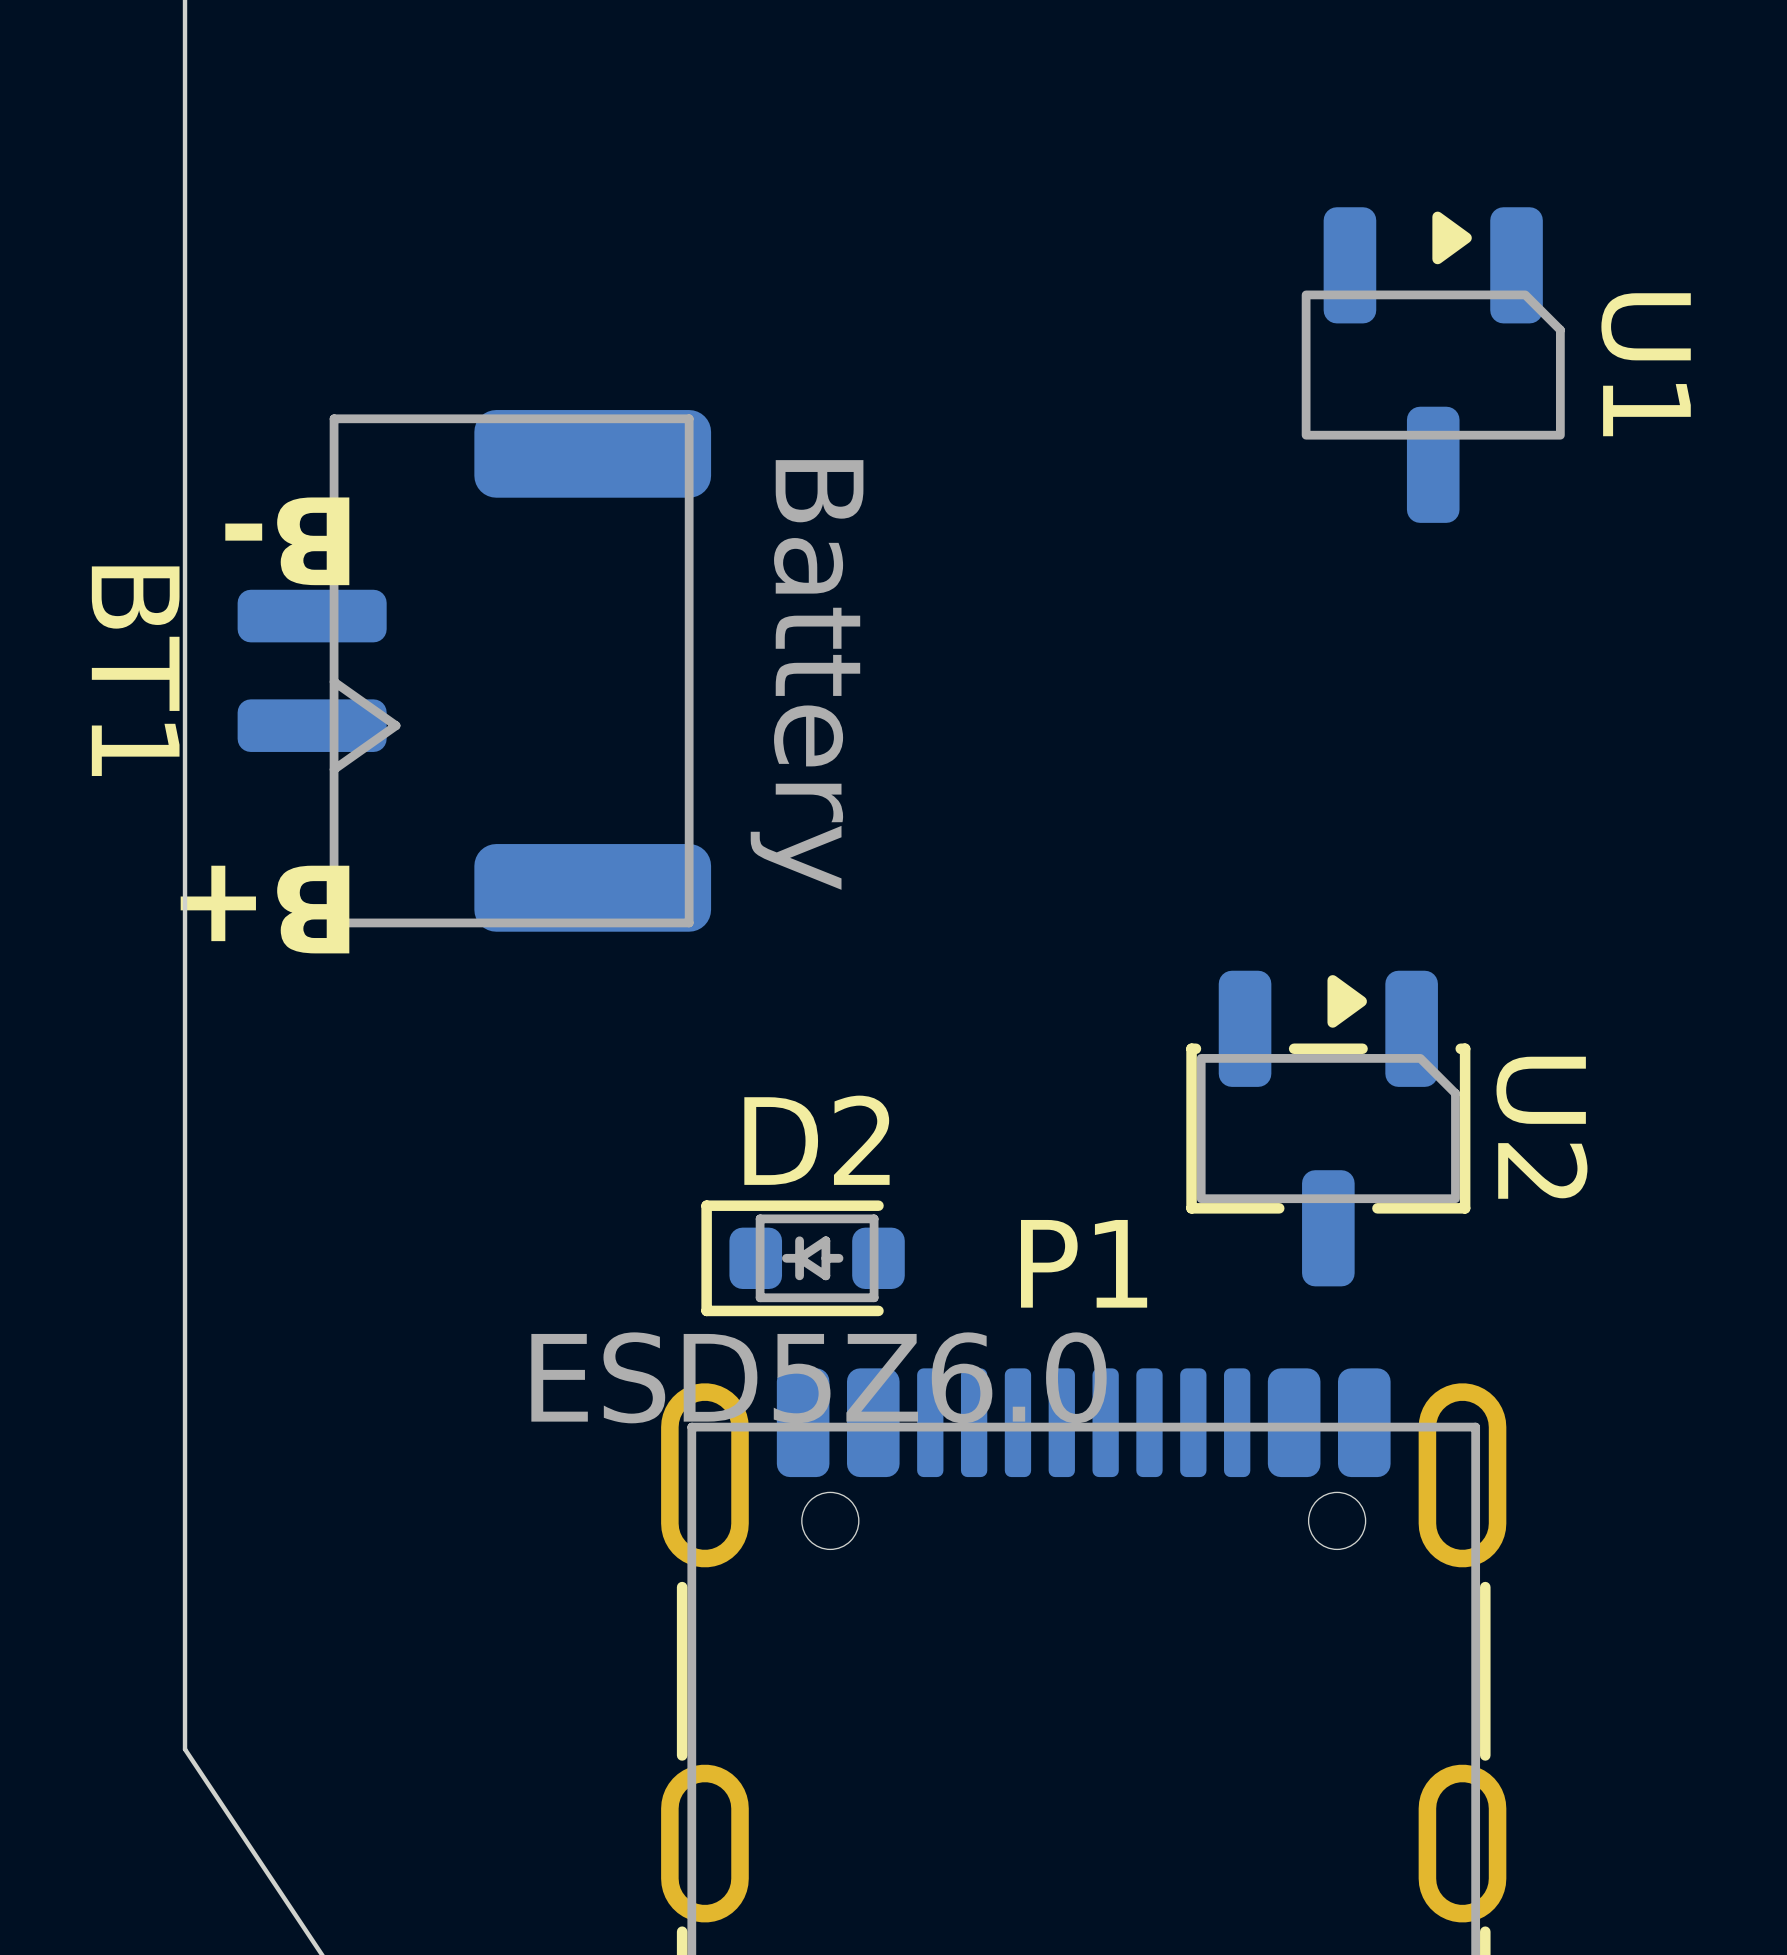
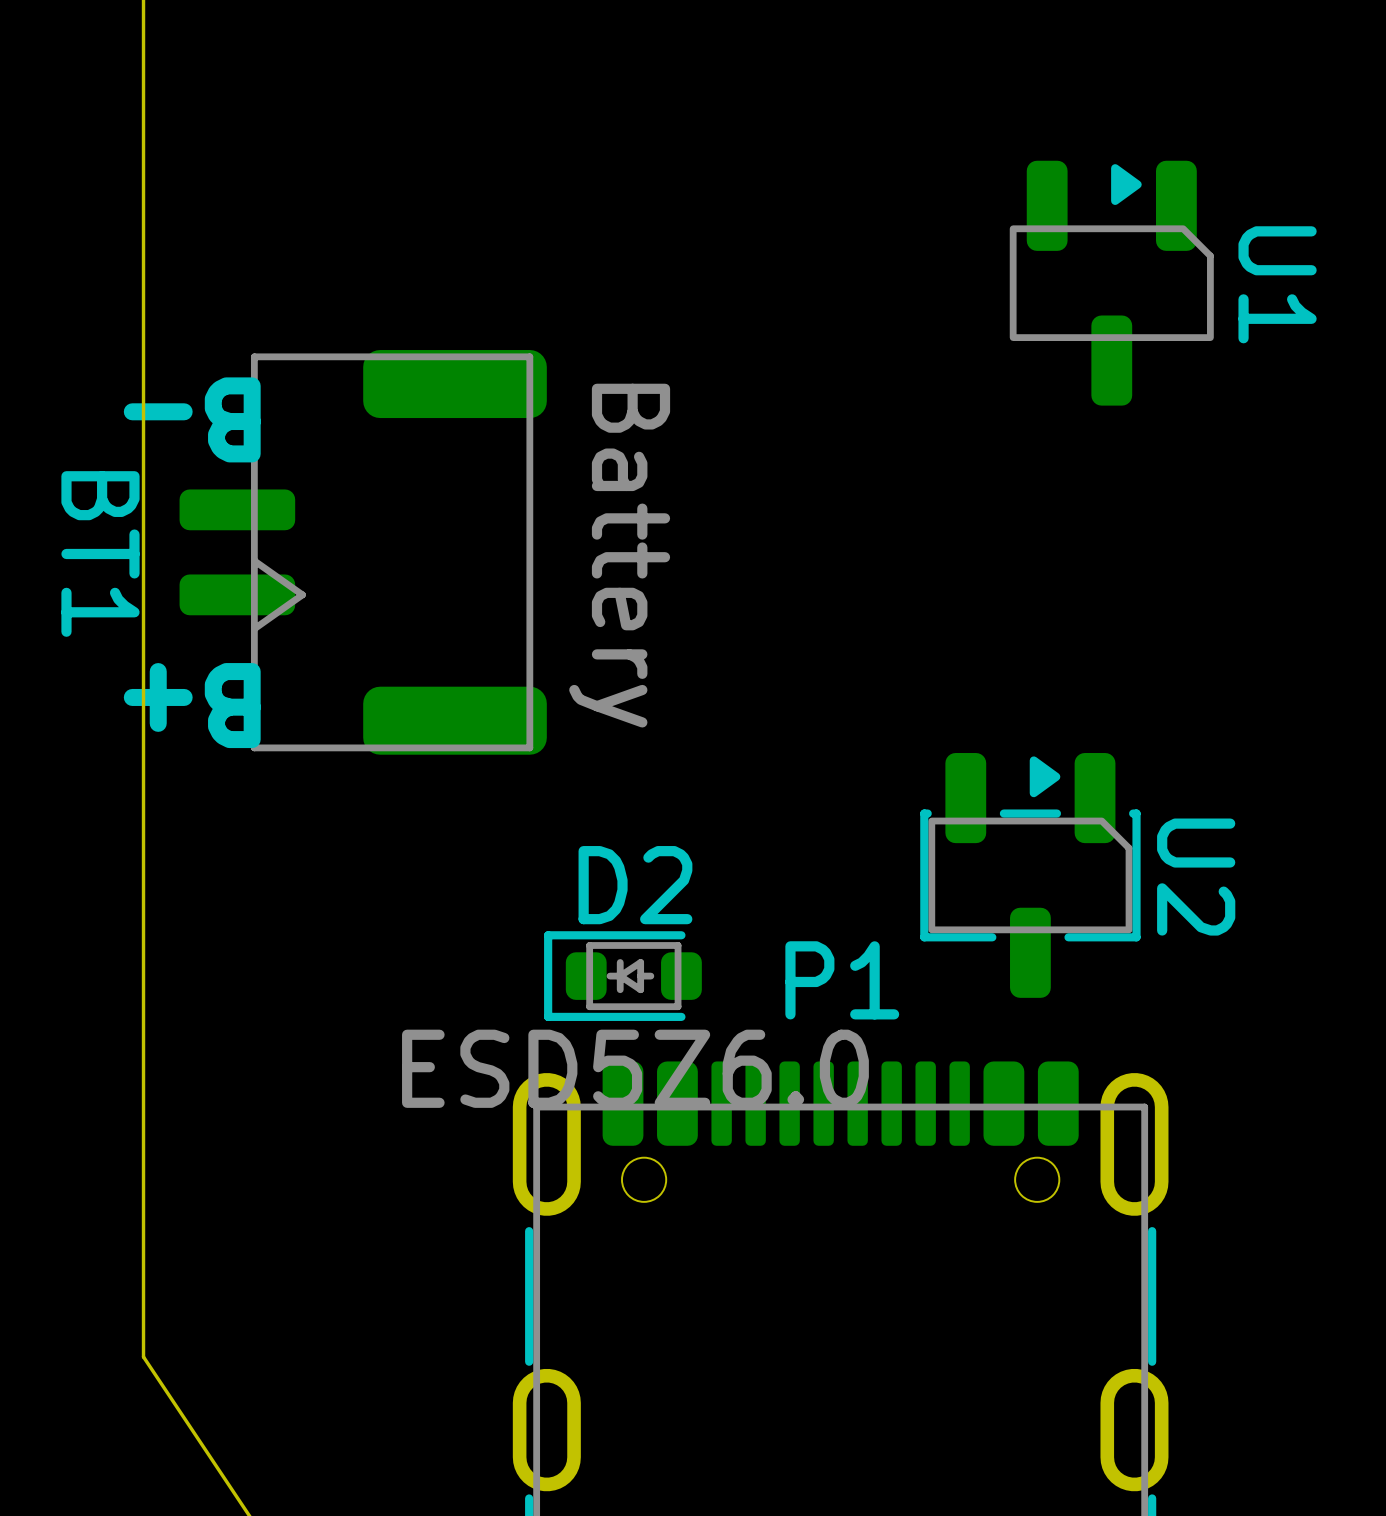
BT1 position: (474, 670) -> (363, 552)

